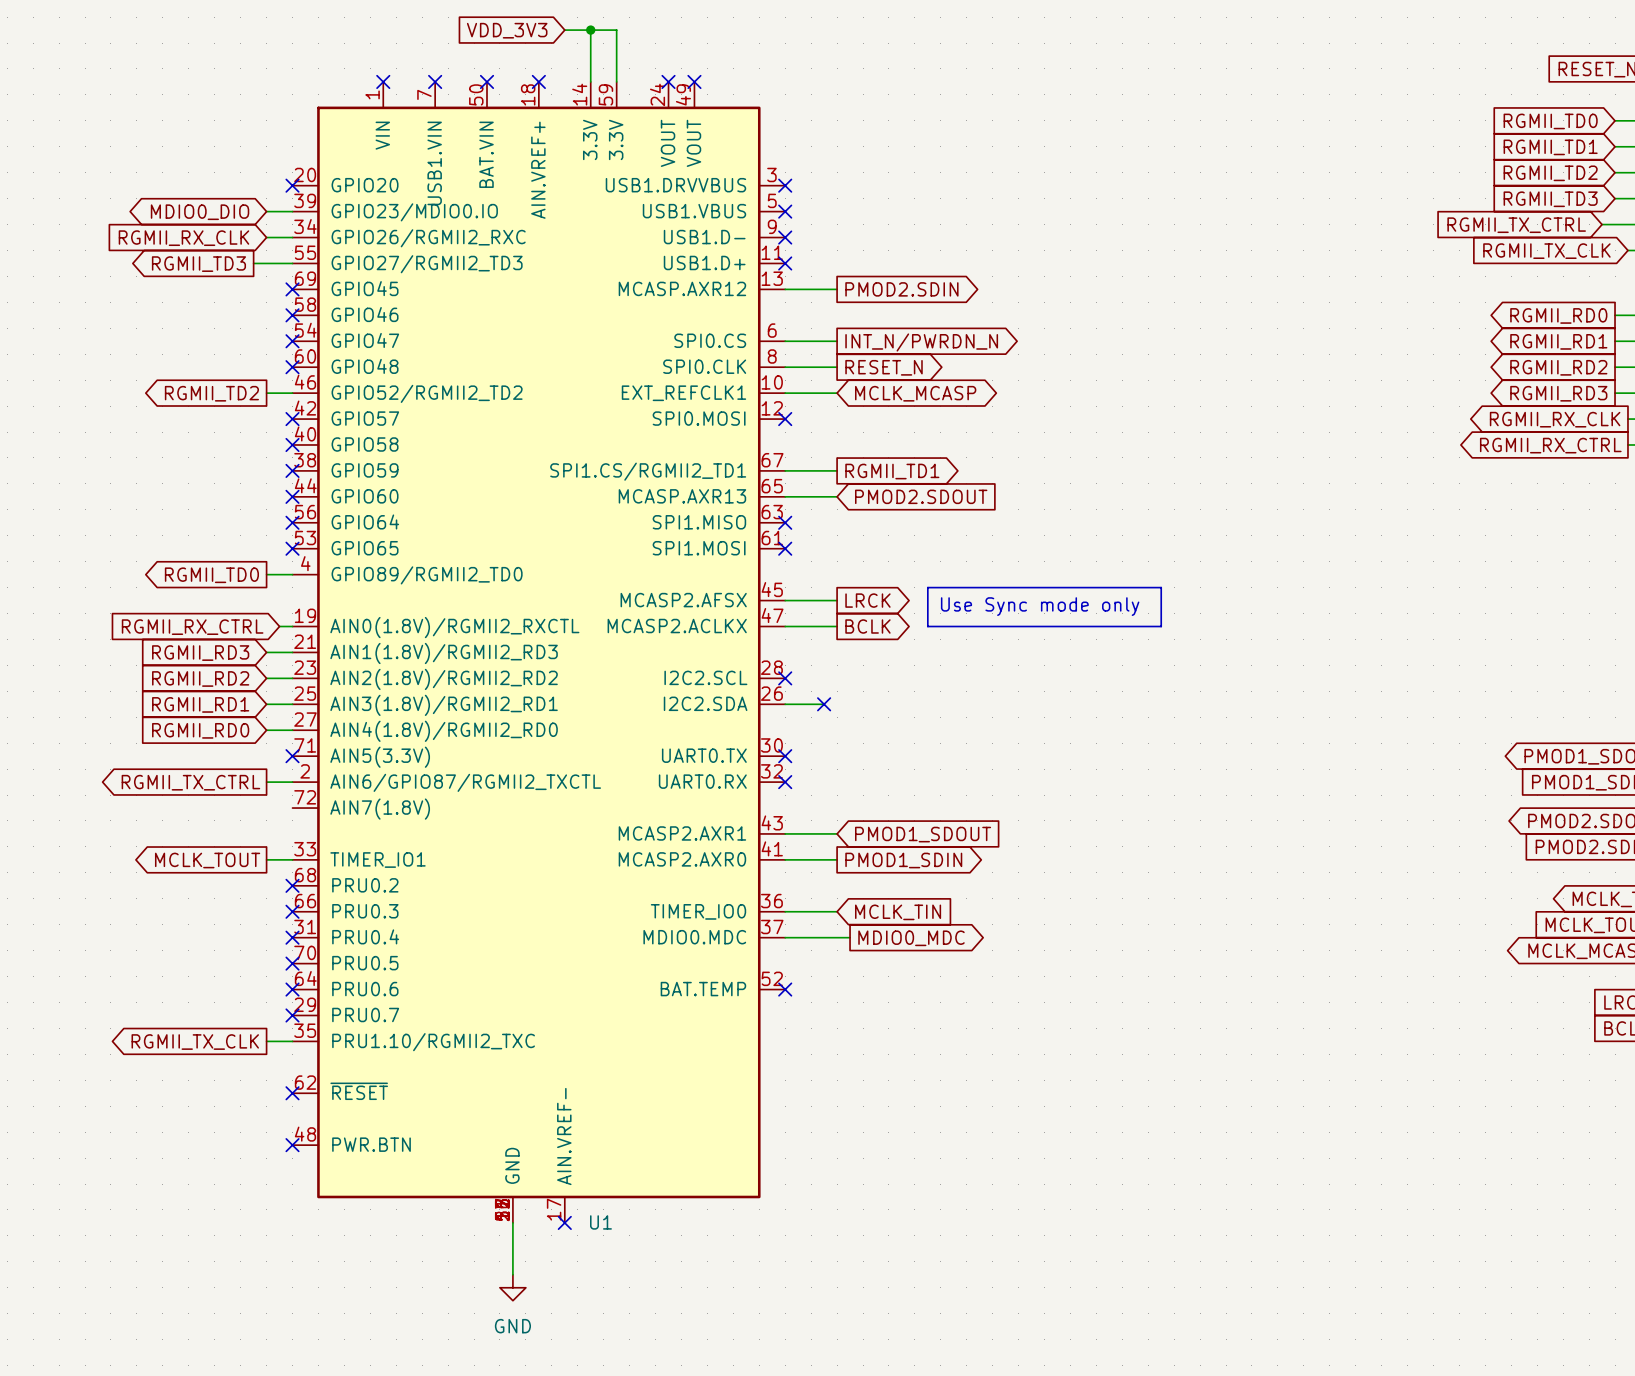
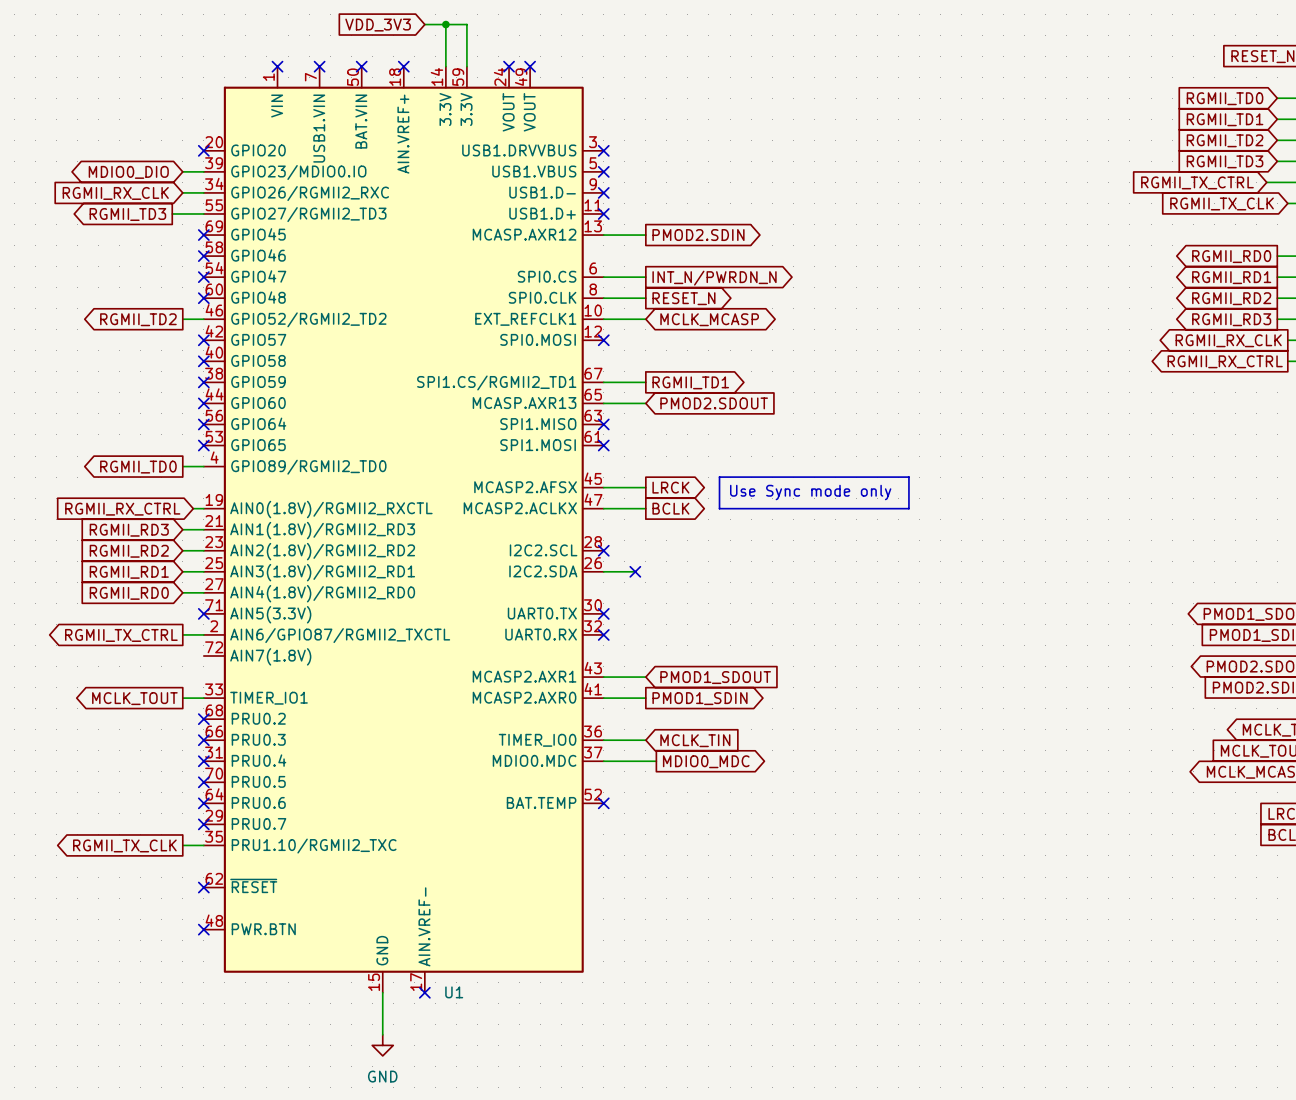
U1 symbol: [292, 81, 786, 1223] -> [203, 66, 604, 993]

